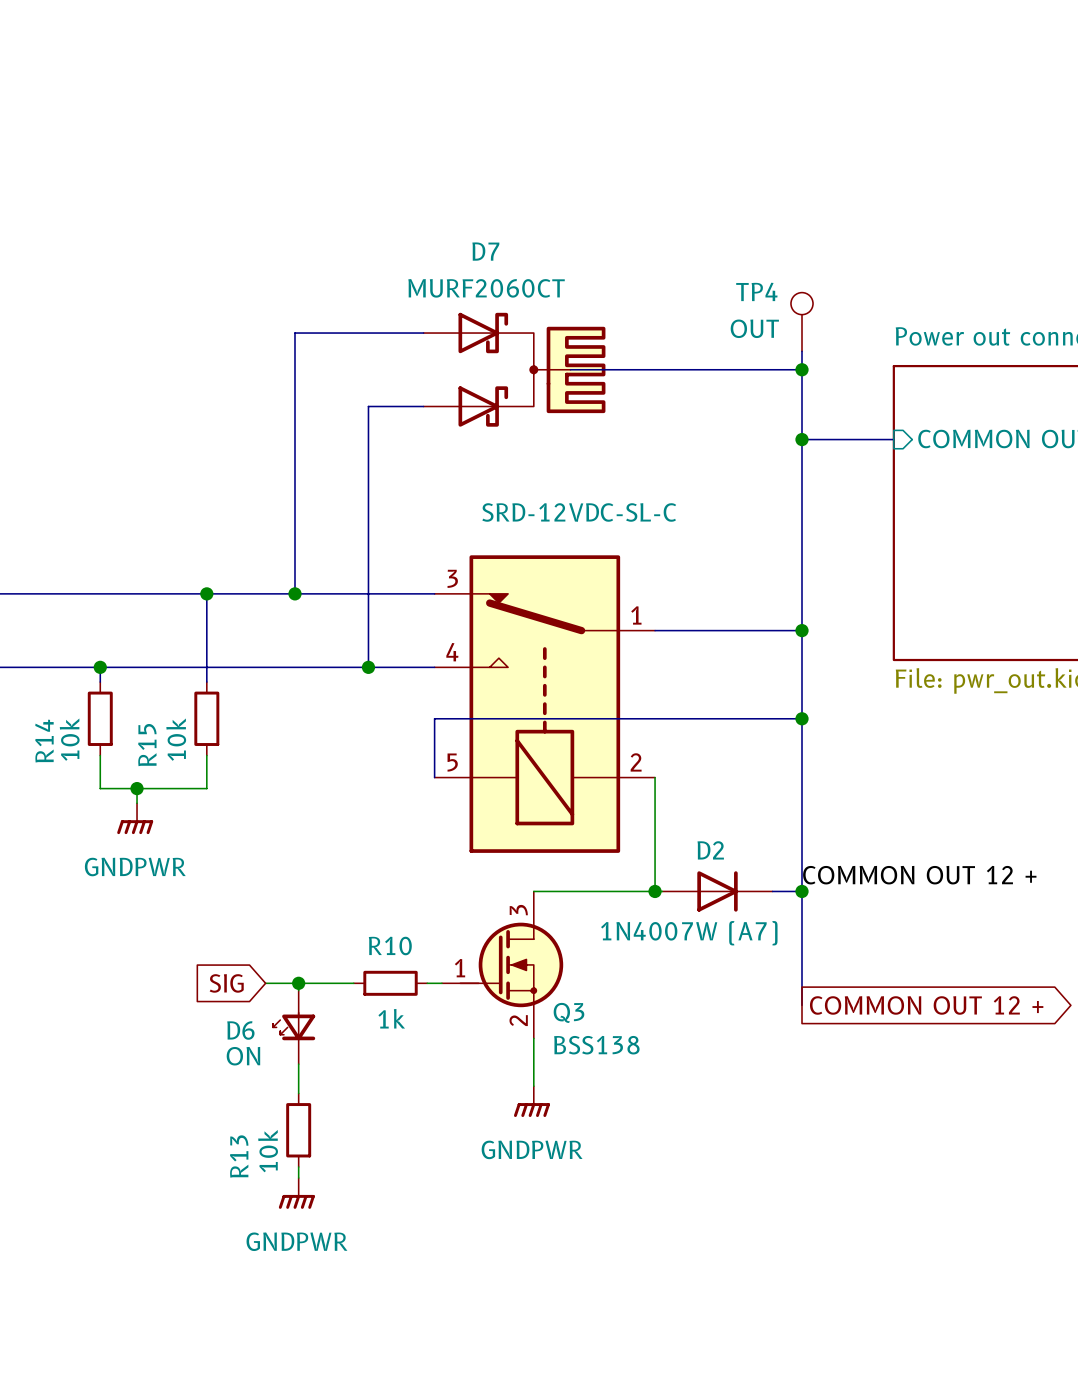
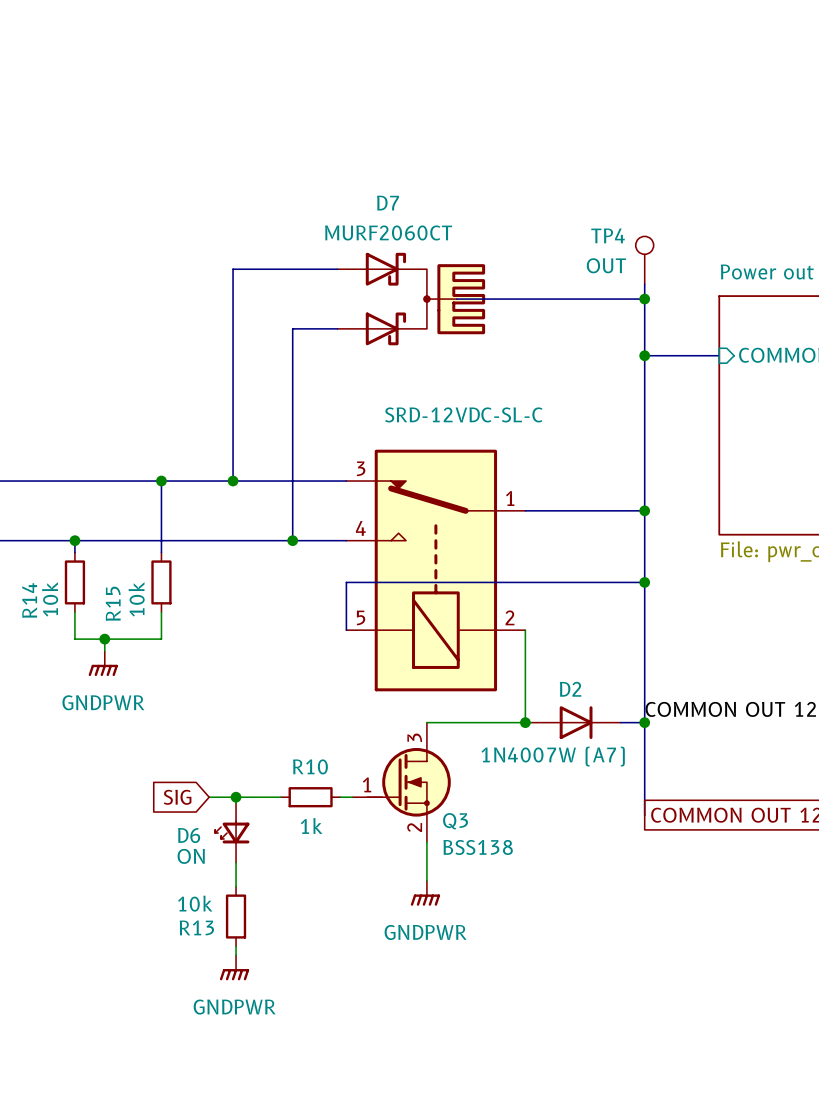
R13 value rotation: 0° (268, 1151) -> 90° clockwise (195, 903)
R13 name rotation: 0° (239, 1156) -> 90° clockwise (196, 927)

